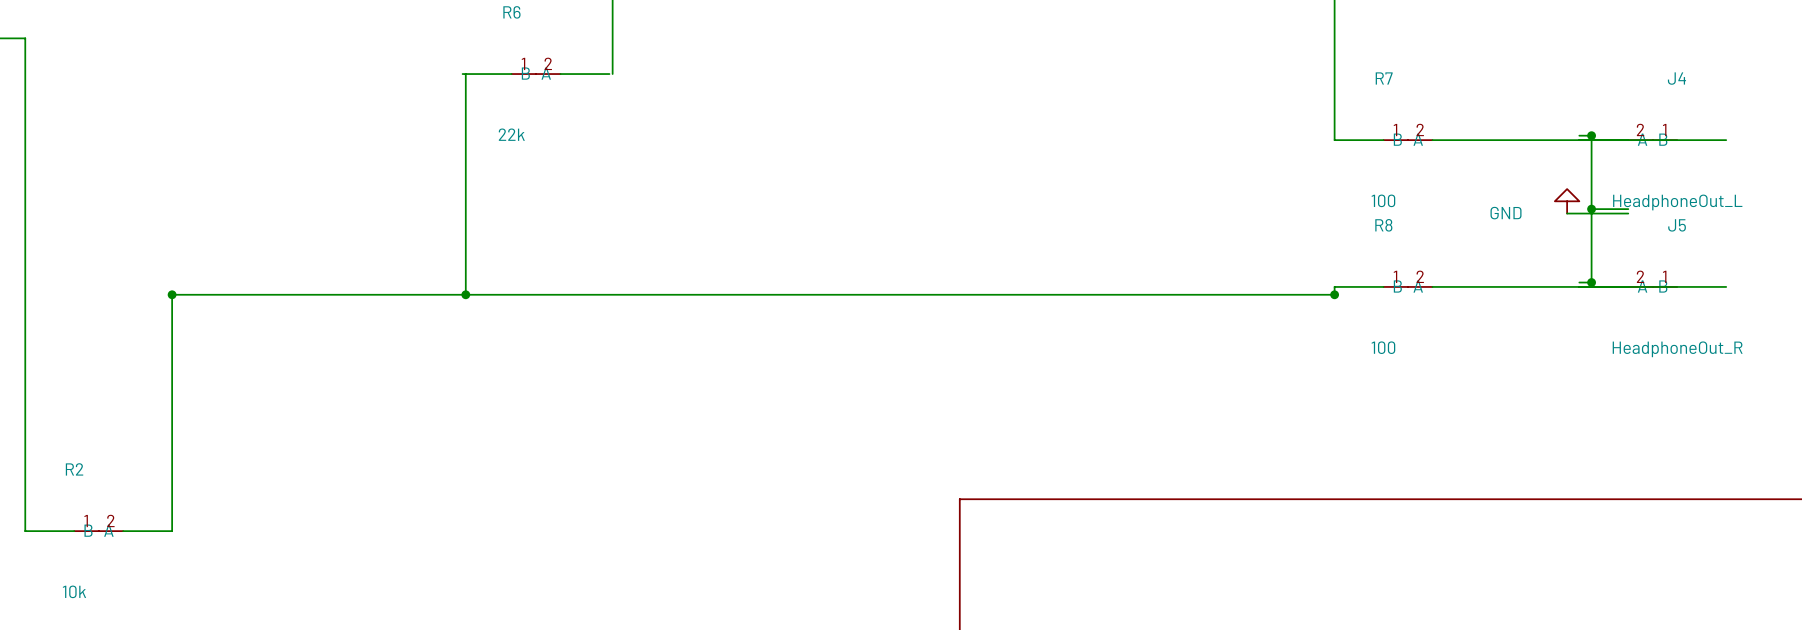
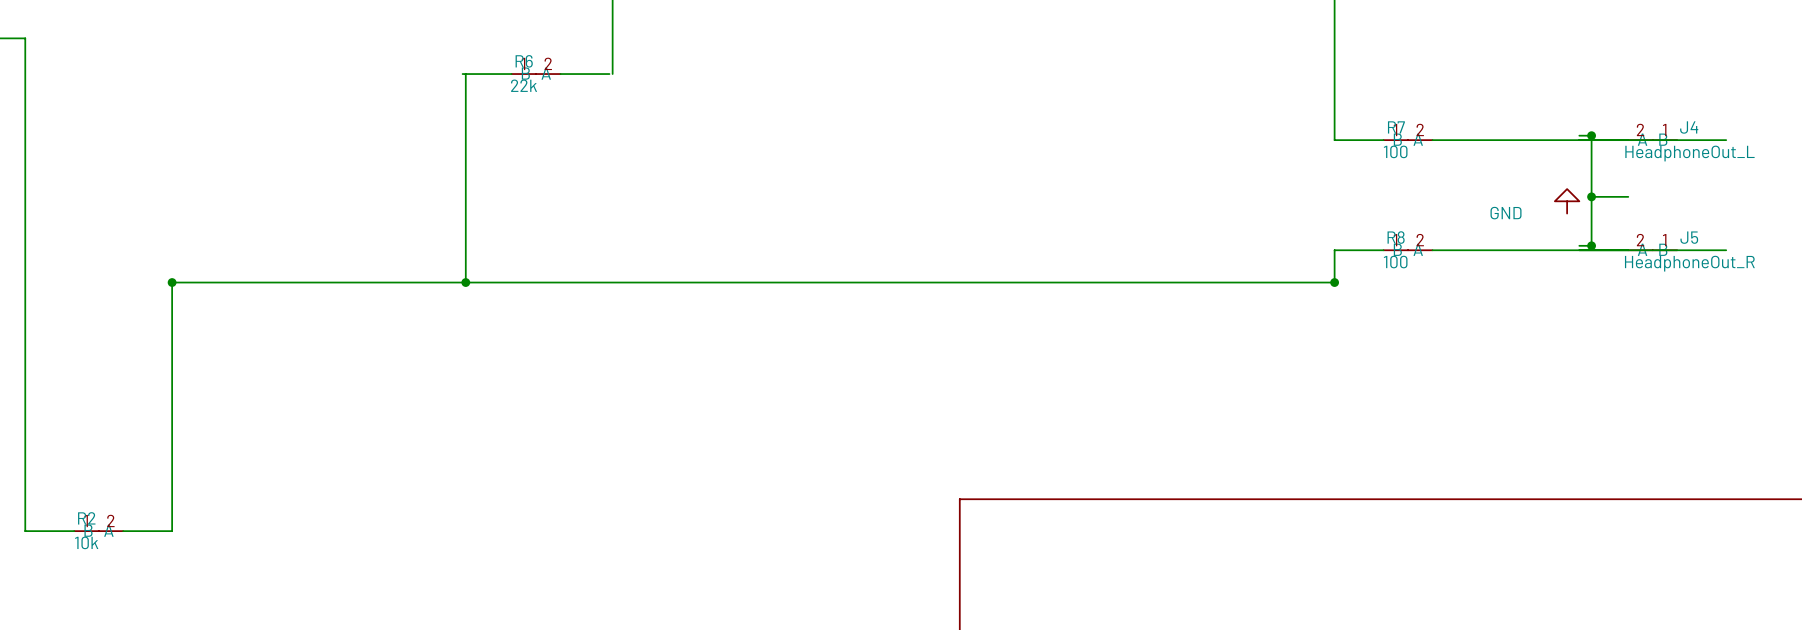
R6 name position: R6 (511, 12) -> R6 (524, 61)
R7 name position: R7 (1384, 78) -> R7 (1396, 127)
J4 name position: J4 (1676, 78) -> J4 (1689, 127)
R6 value position: 22k (511, 134) -> 22k (524, 85)
R7 value position: 100 (1383, 200) -> 100 (1395, 151)
J4 value position: HeadphoneOut_L (1677, 202) -> HeadphoneOut_L (1689, 153)
wire: (1591, 209) (1628, 209) -> (1591, 196) (1628, 196)
junction position: (1591, 209) -> (1591, 196)
wire: (1567, 213) (1628, 213) -> none
R8 name position: R8 (1383, 225) -> R8 (1396, 237)
J5 name position: J5 (1677, 225) -> J5 (1689, 237)
wire: (1591, 245) (1591, 282) (1579, 282) -> (1591, 245) (1579, 245)
junction: none -> (1591, 245)
wire: (465, 282) (465, 294) -> none
junction: (1591, 282) -> none
wire: (1383, 286) (1334, 286) (1334, 294) (172, 294) -> (1383, 250) (1334, 250) (1334, 282) (172, 282) (172, 294)
R8 position: (1408, 286) -> (1408, 250)
wire: (1432, 286) (1726, 286) -> (1432, 250) (1726, 250)
J5 position: (1652, 286) -> (1652, 250)
junction position: (172, 294) -> (172, 282)
junction position: (465, 294) -> (465, 282)
junction position: (1334, 294) -> (1334, 282)
R8 value position: 100 (1383, 347) -> 100 (1395, 262)
J5 value position: HeadphoneOut_R (1677, 349) -> HeadphoneOut_R (1689, 263)
R2 name position: R2 (74, 469) -> R2 (86, 518)
R2 value position: 10k (74, 591) -> 10k (86, 542)

